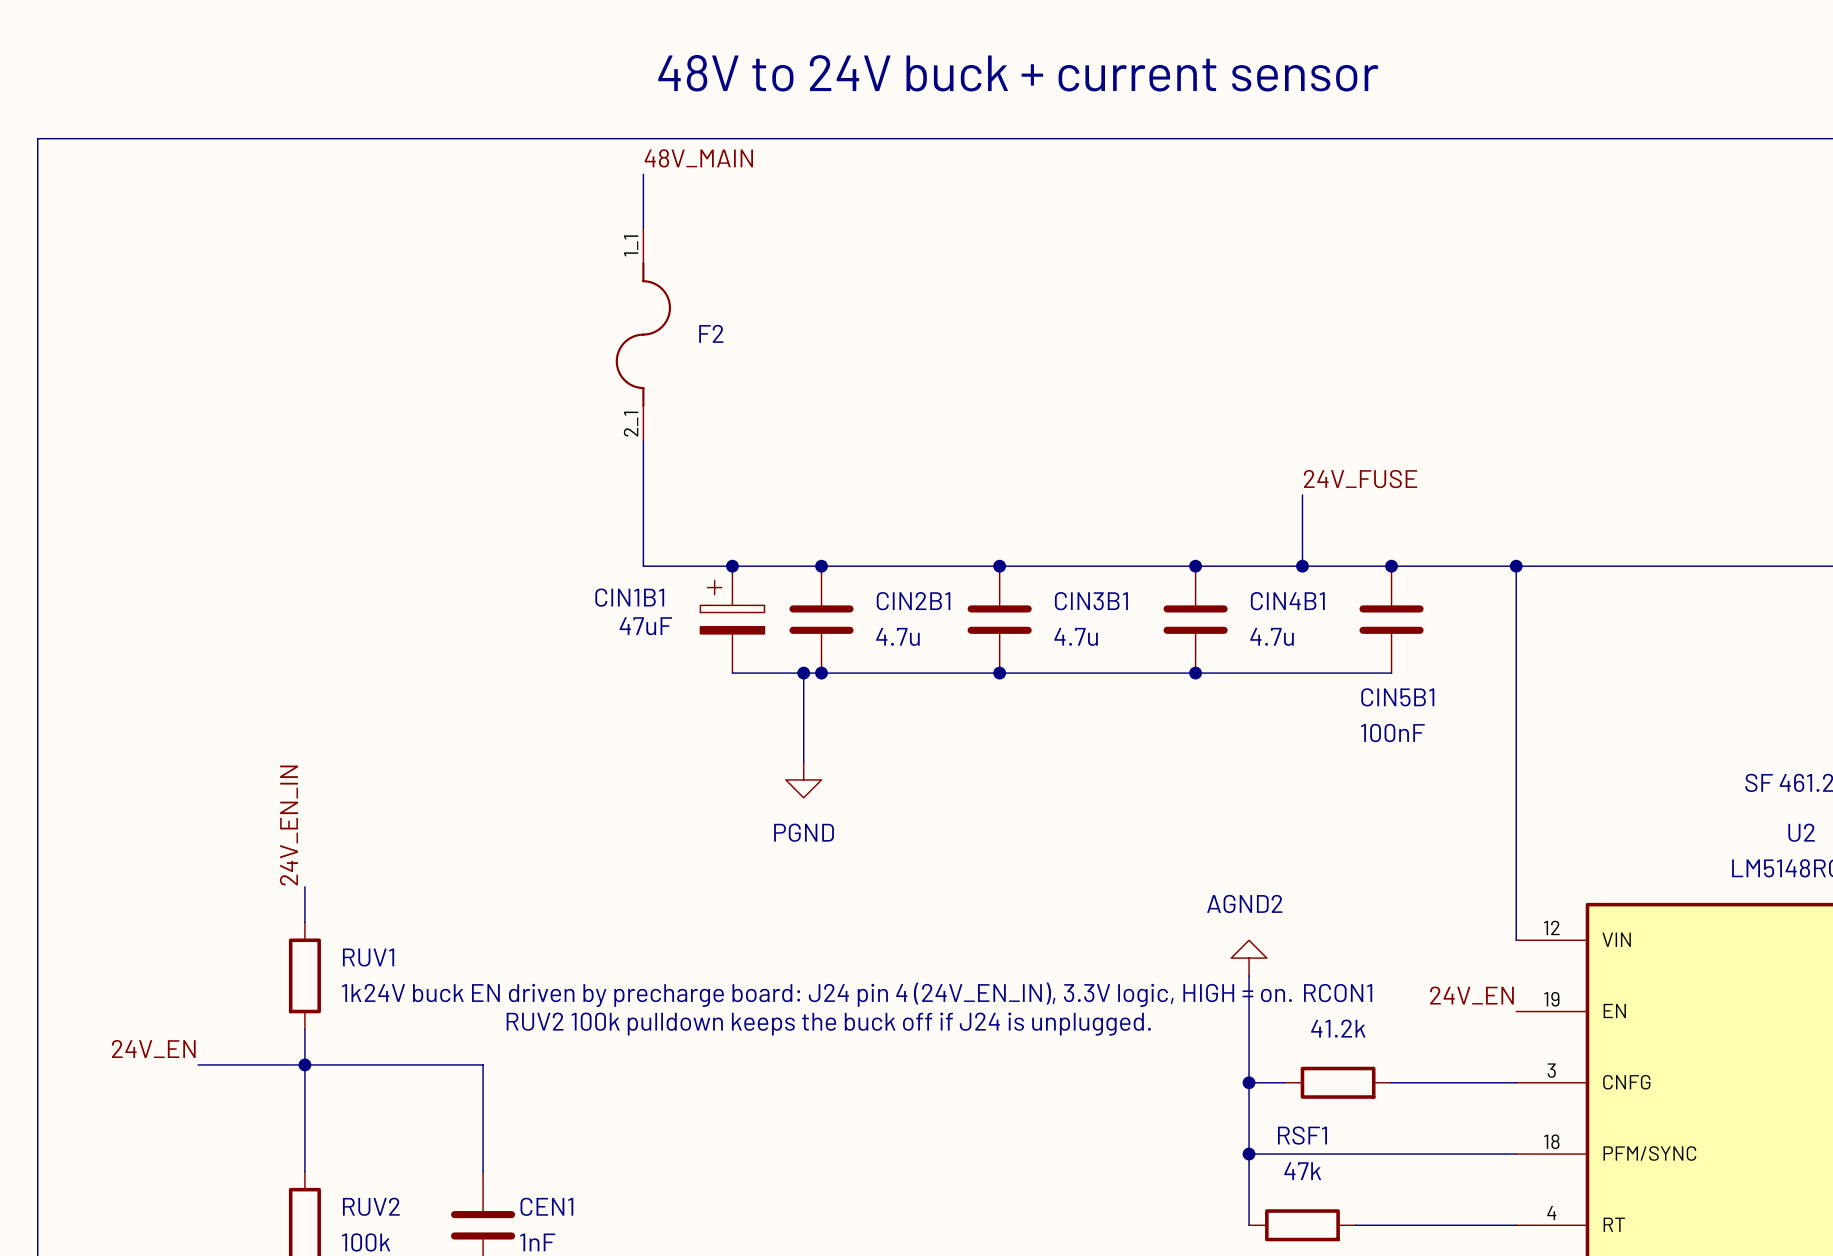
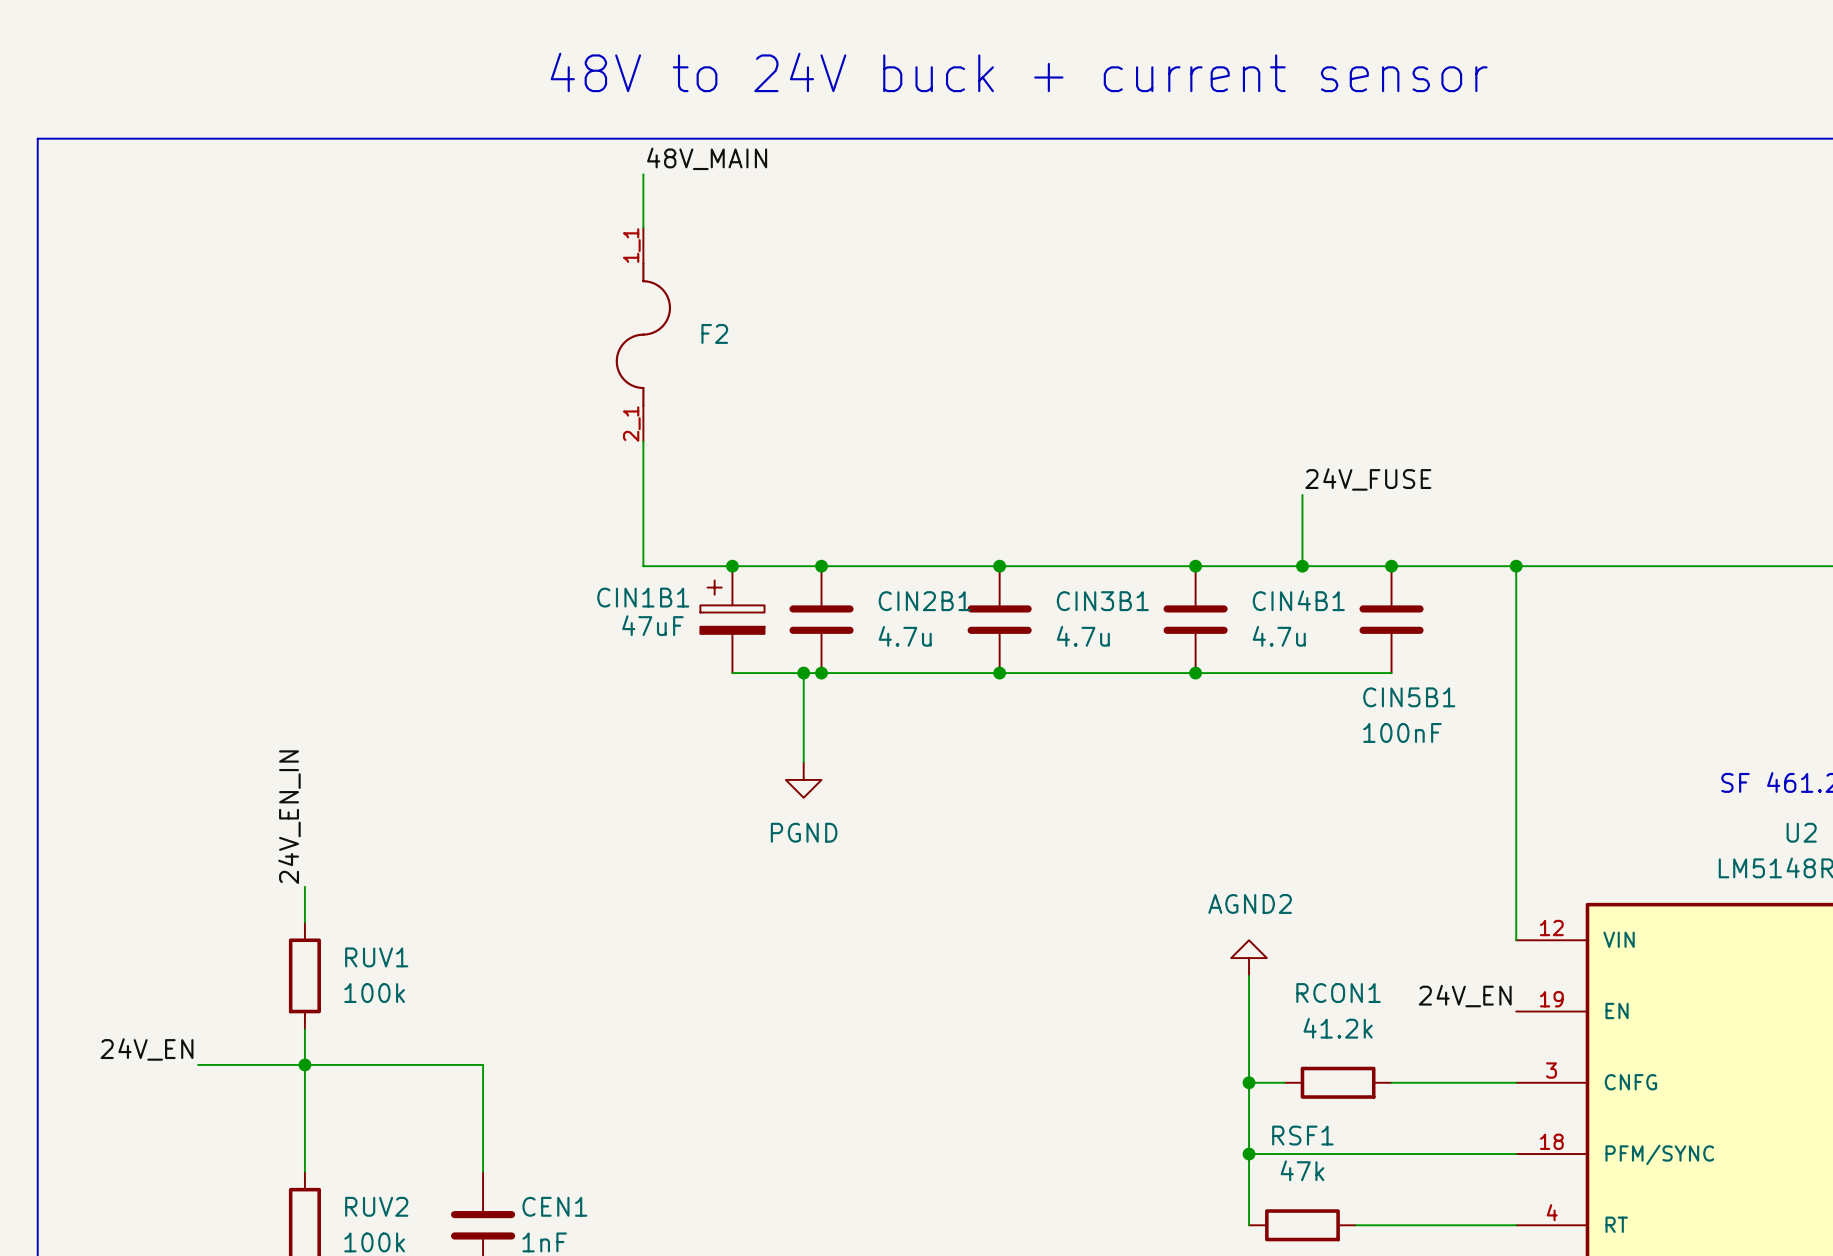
RUV1 value: 1k (351, 993) -> 100k (374, 993)
text: 24V buck EN driven by precharge board: J24 pin 4 (24V_EN_IN), 3.3V logic, HIGH = on. (828, 994) -> none
text: RUV2 100k pulldown keeps the buck off if J24 is unplugged. (828, 1024) -> none

